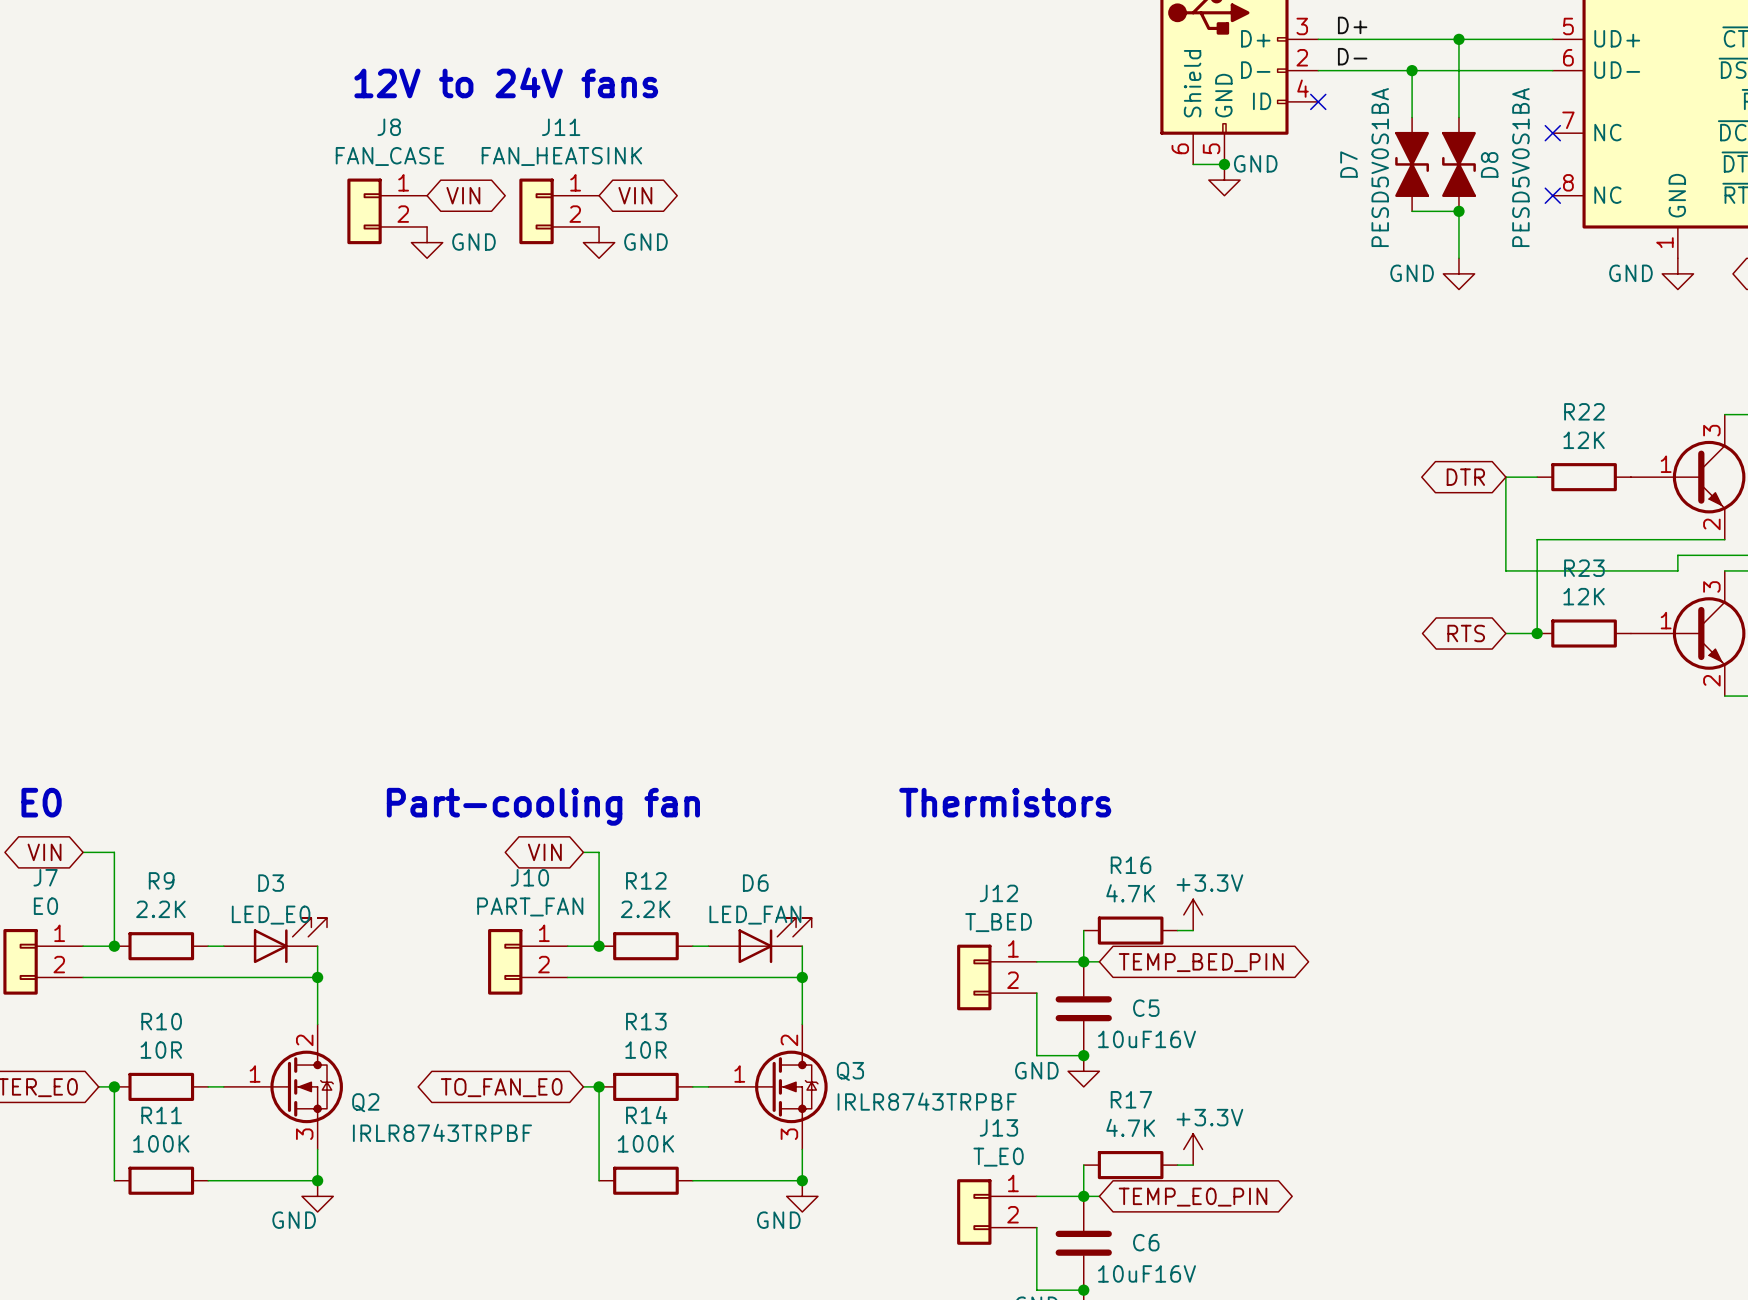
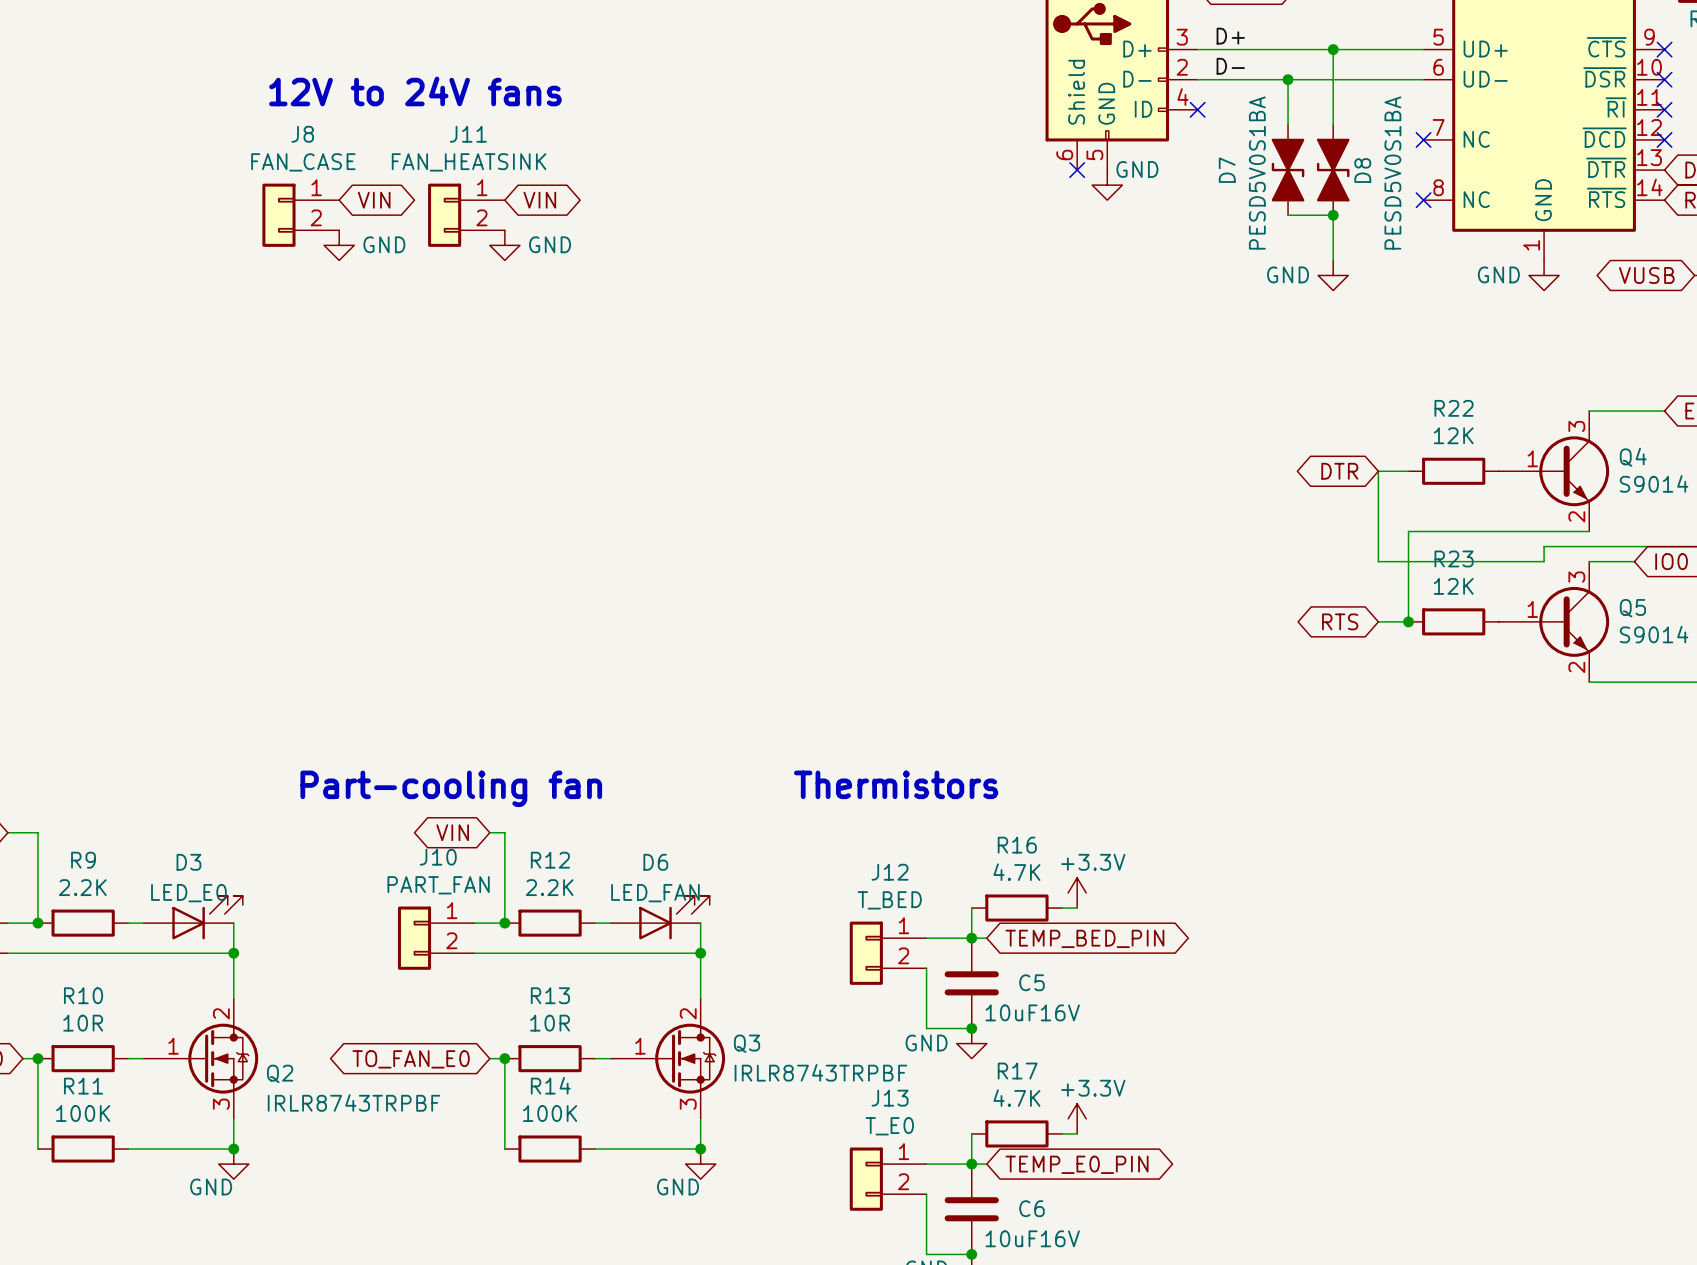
wire: (1193, 164) (1224, 164) -> none
no-connect mark: none -> (1077, 170)
junction: (1224, 164) -> none

